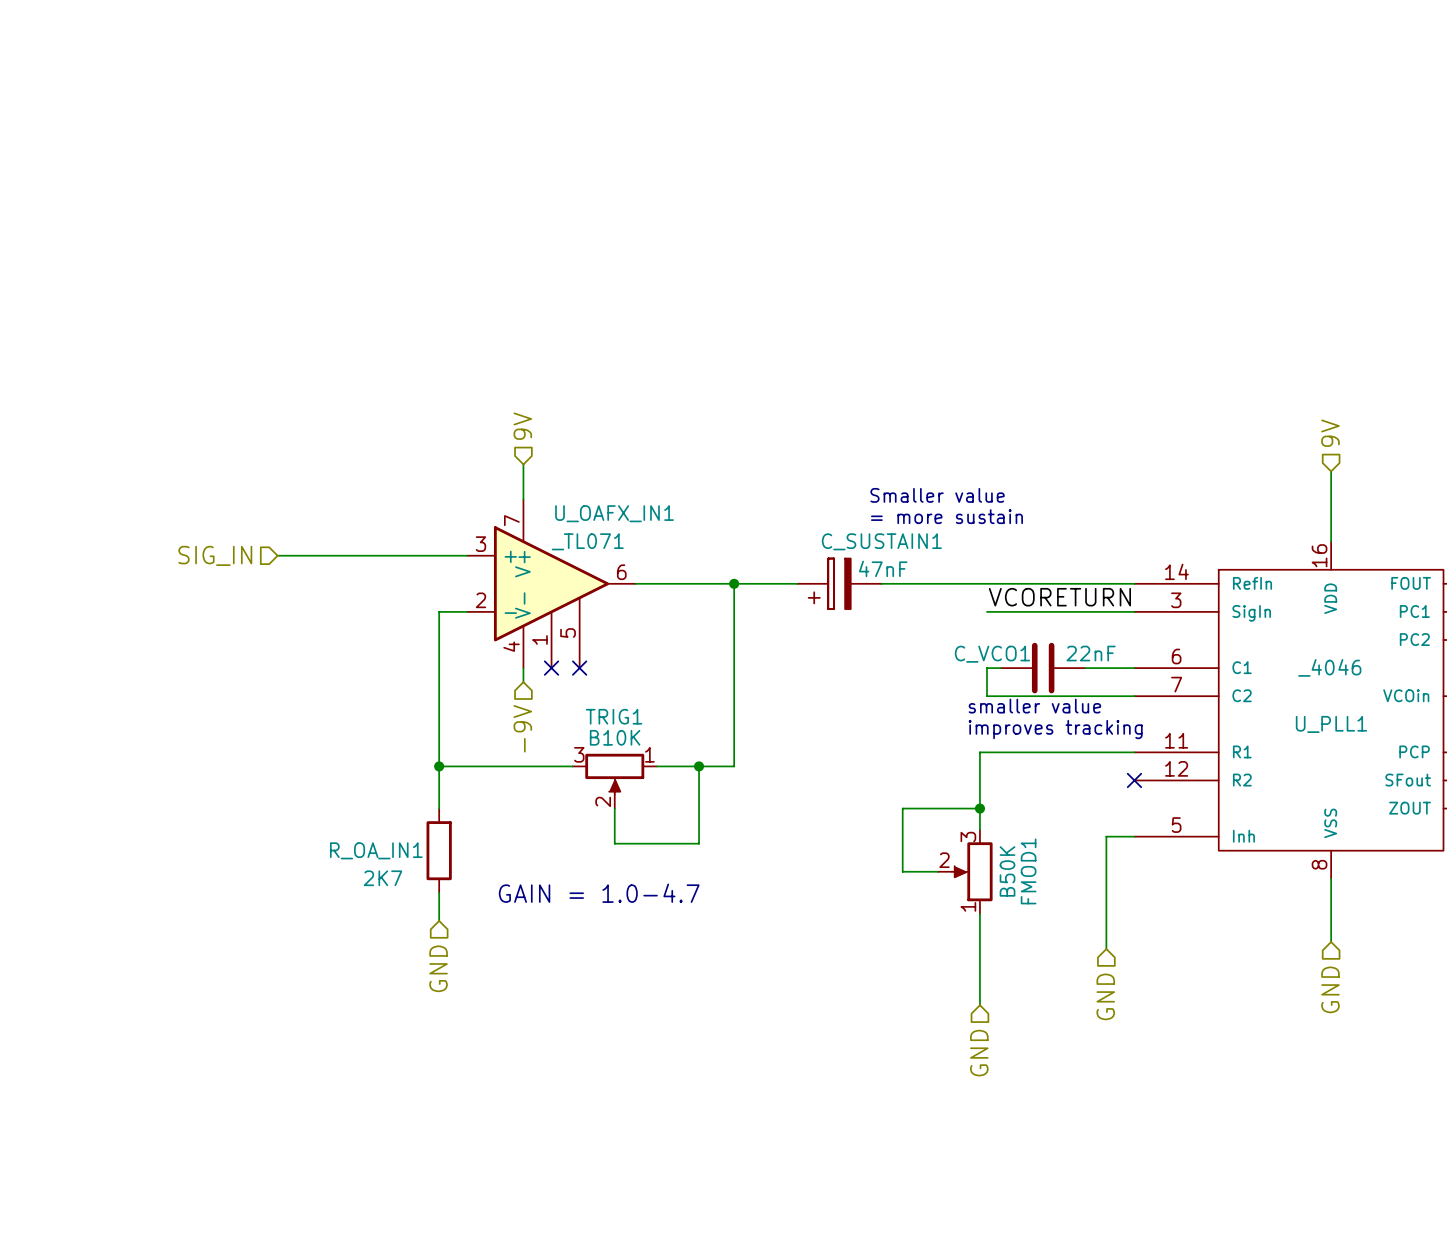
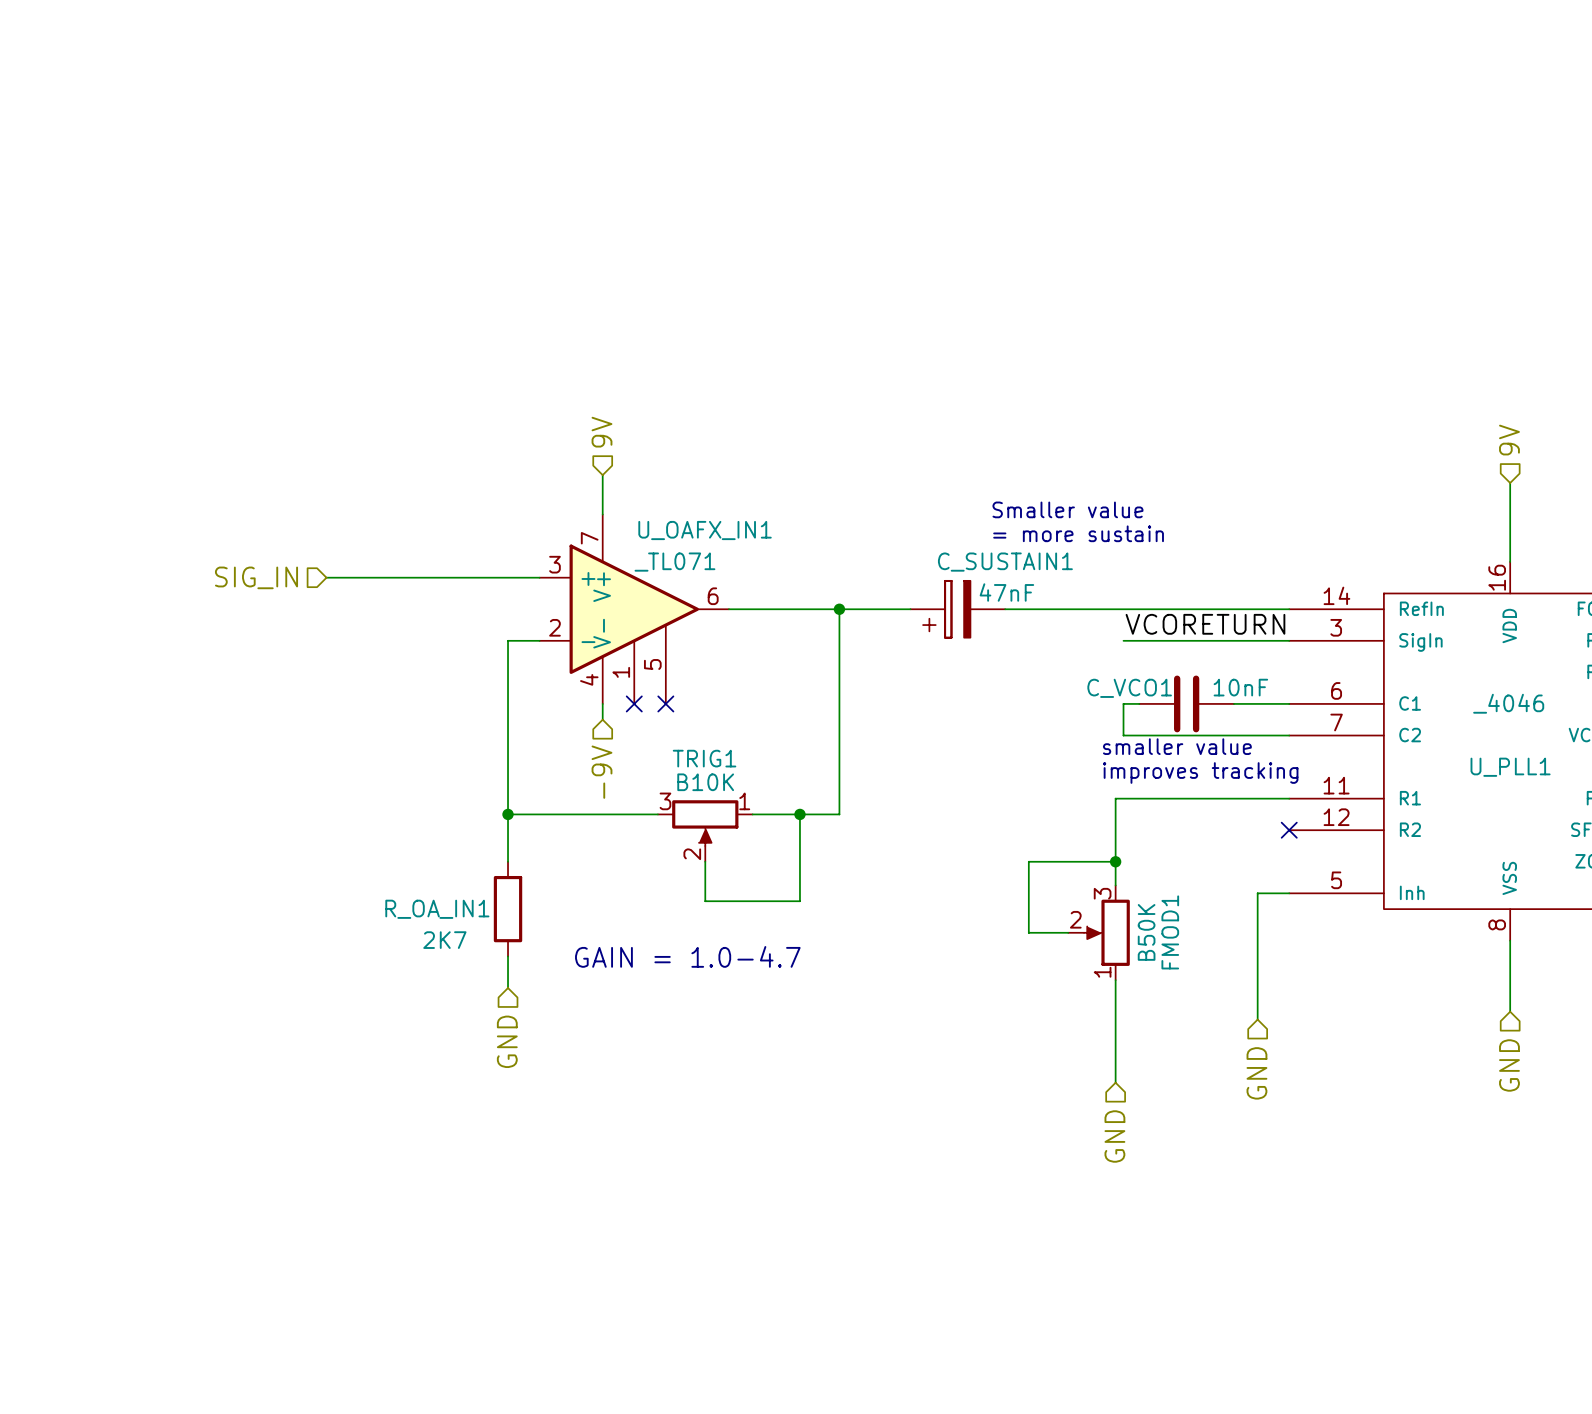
C_VCO1 value: 22nF (1091, 653) -> 10nF (1240, 687)

